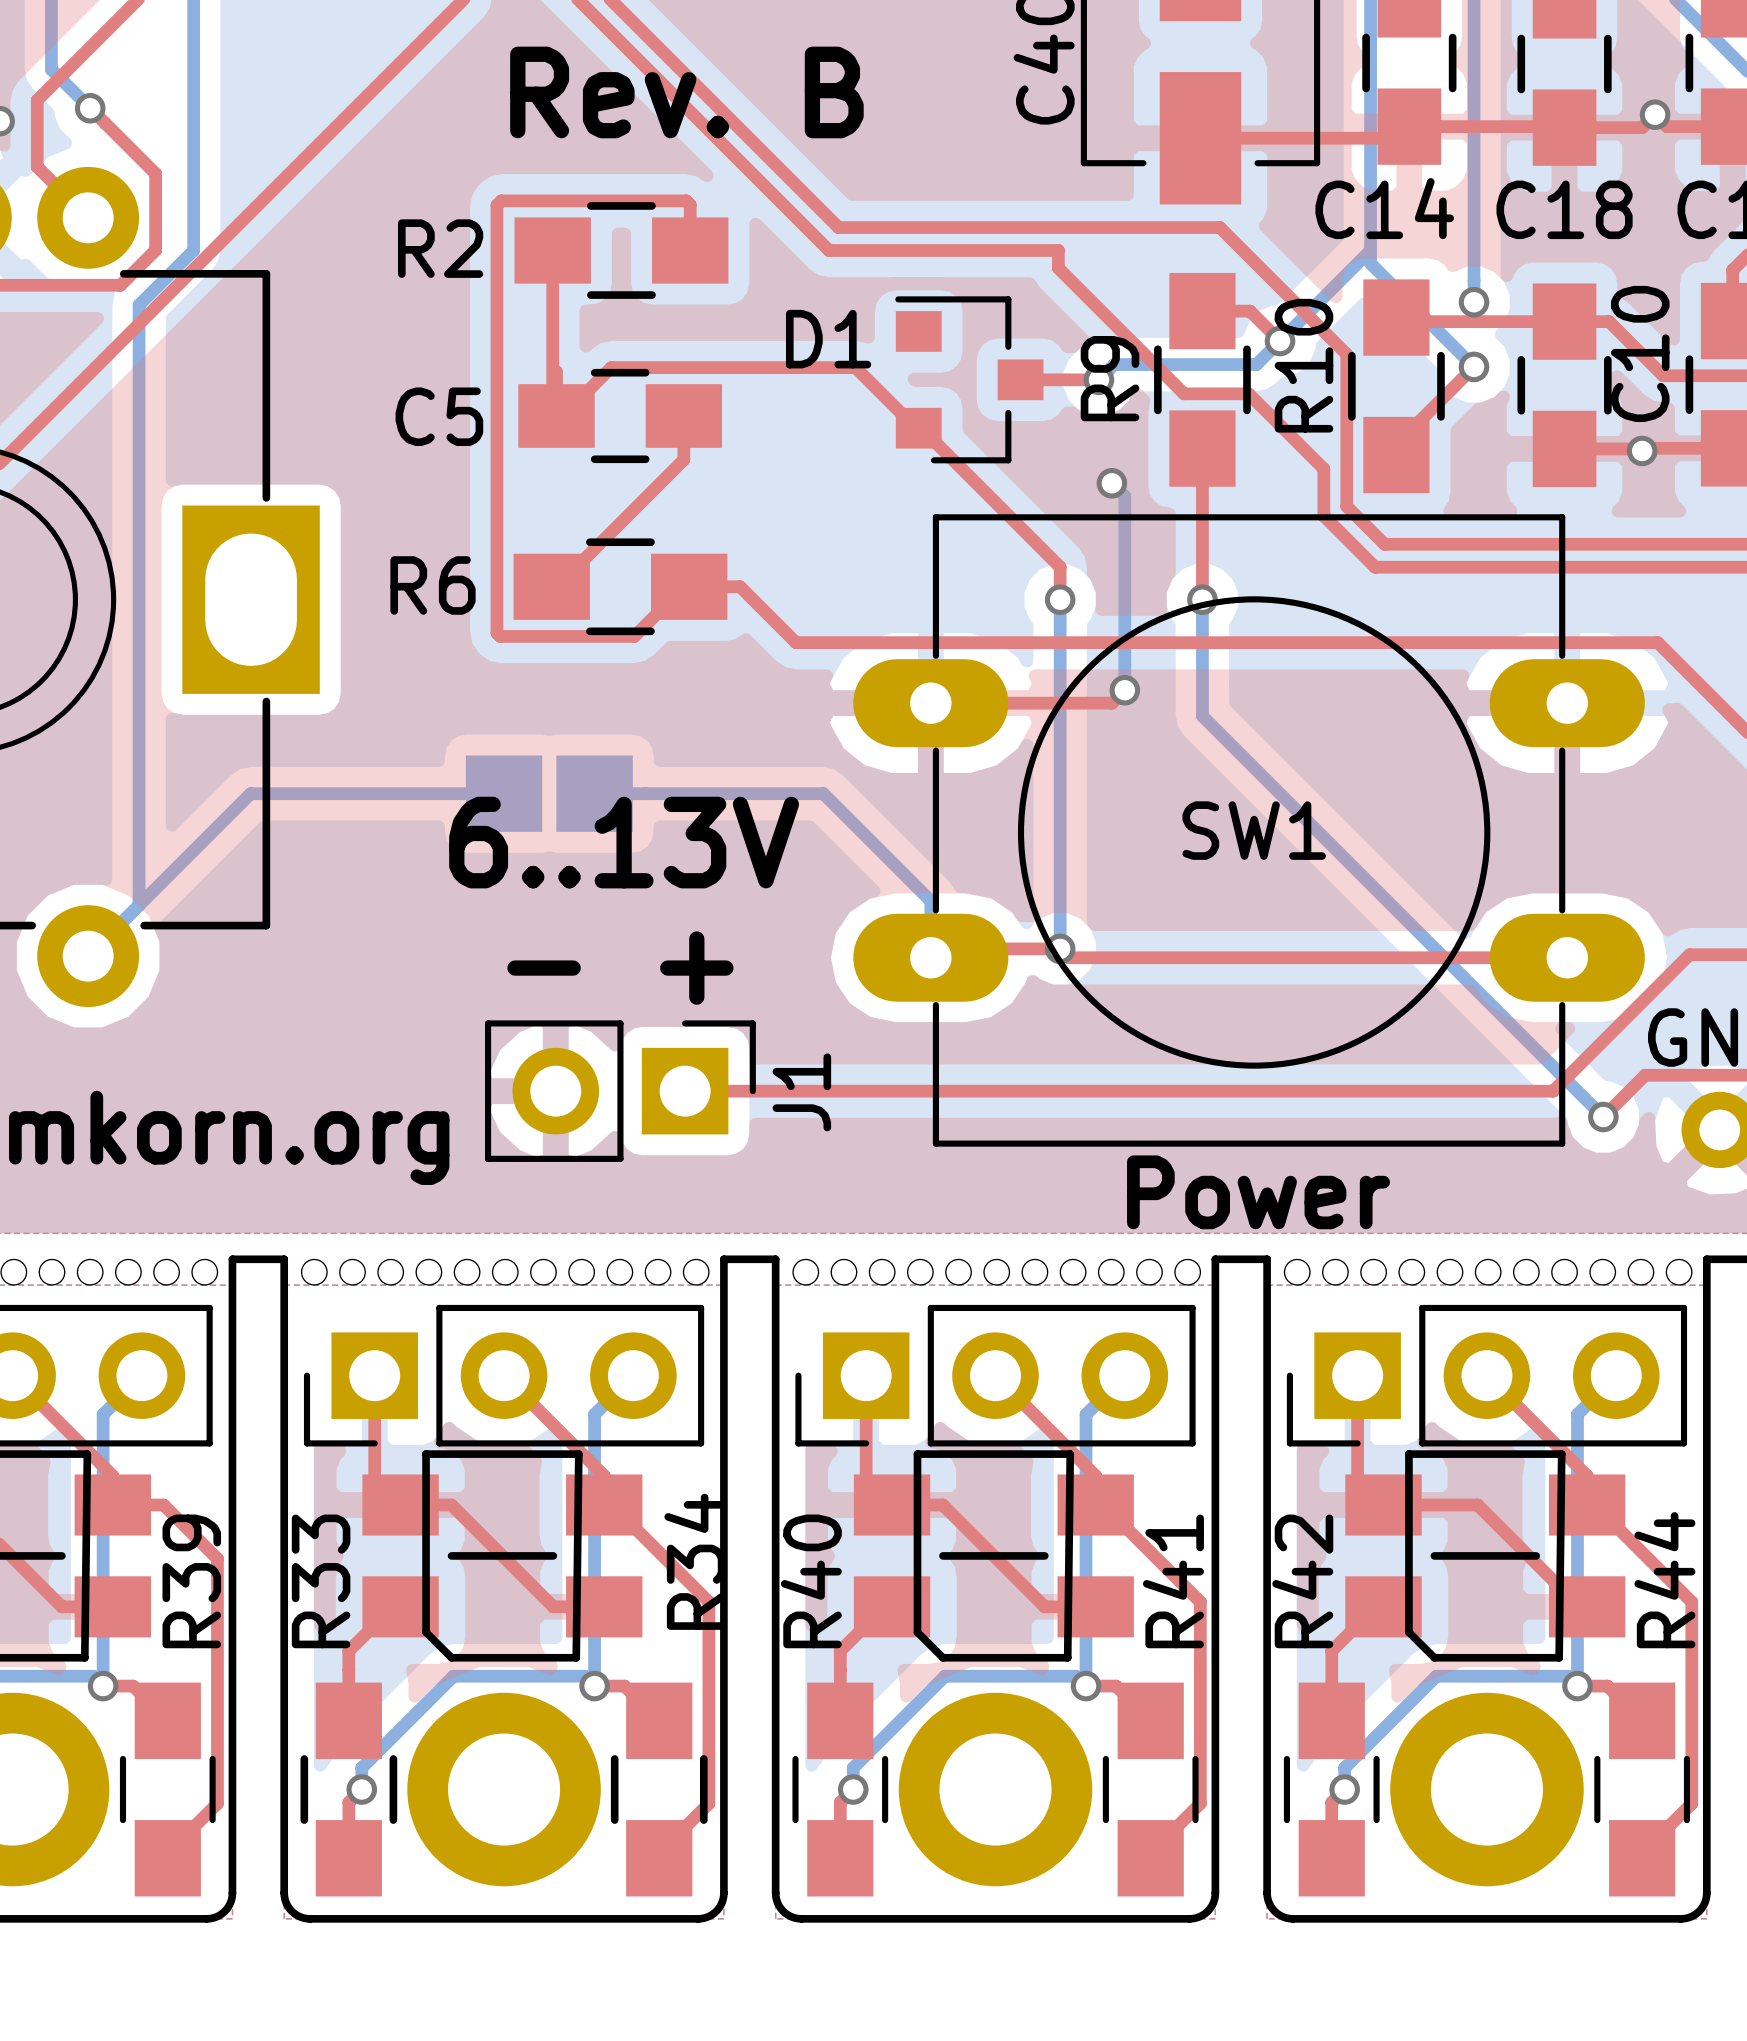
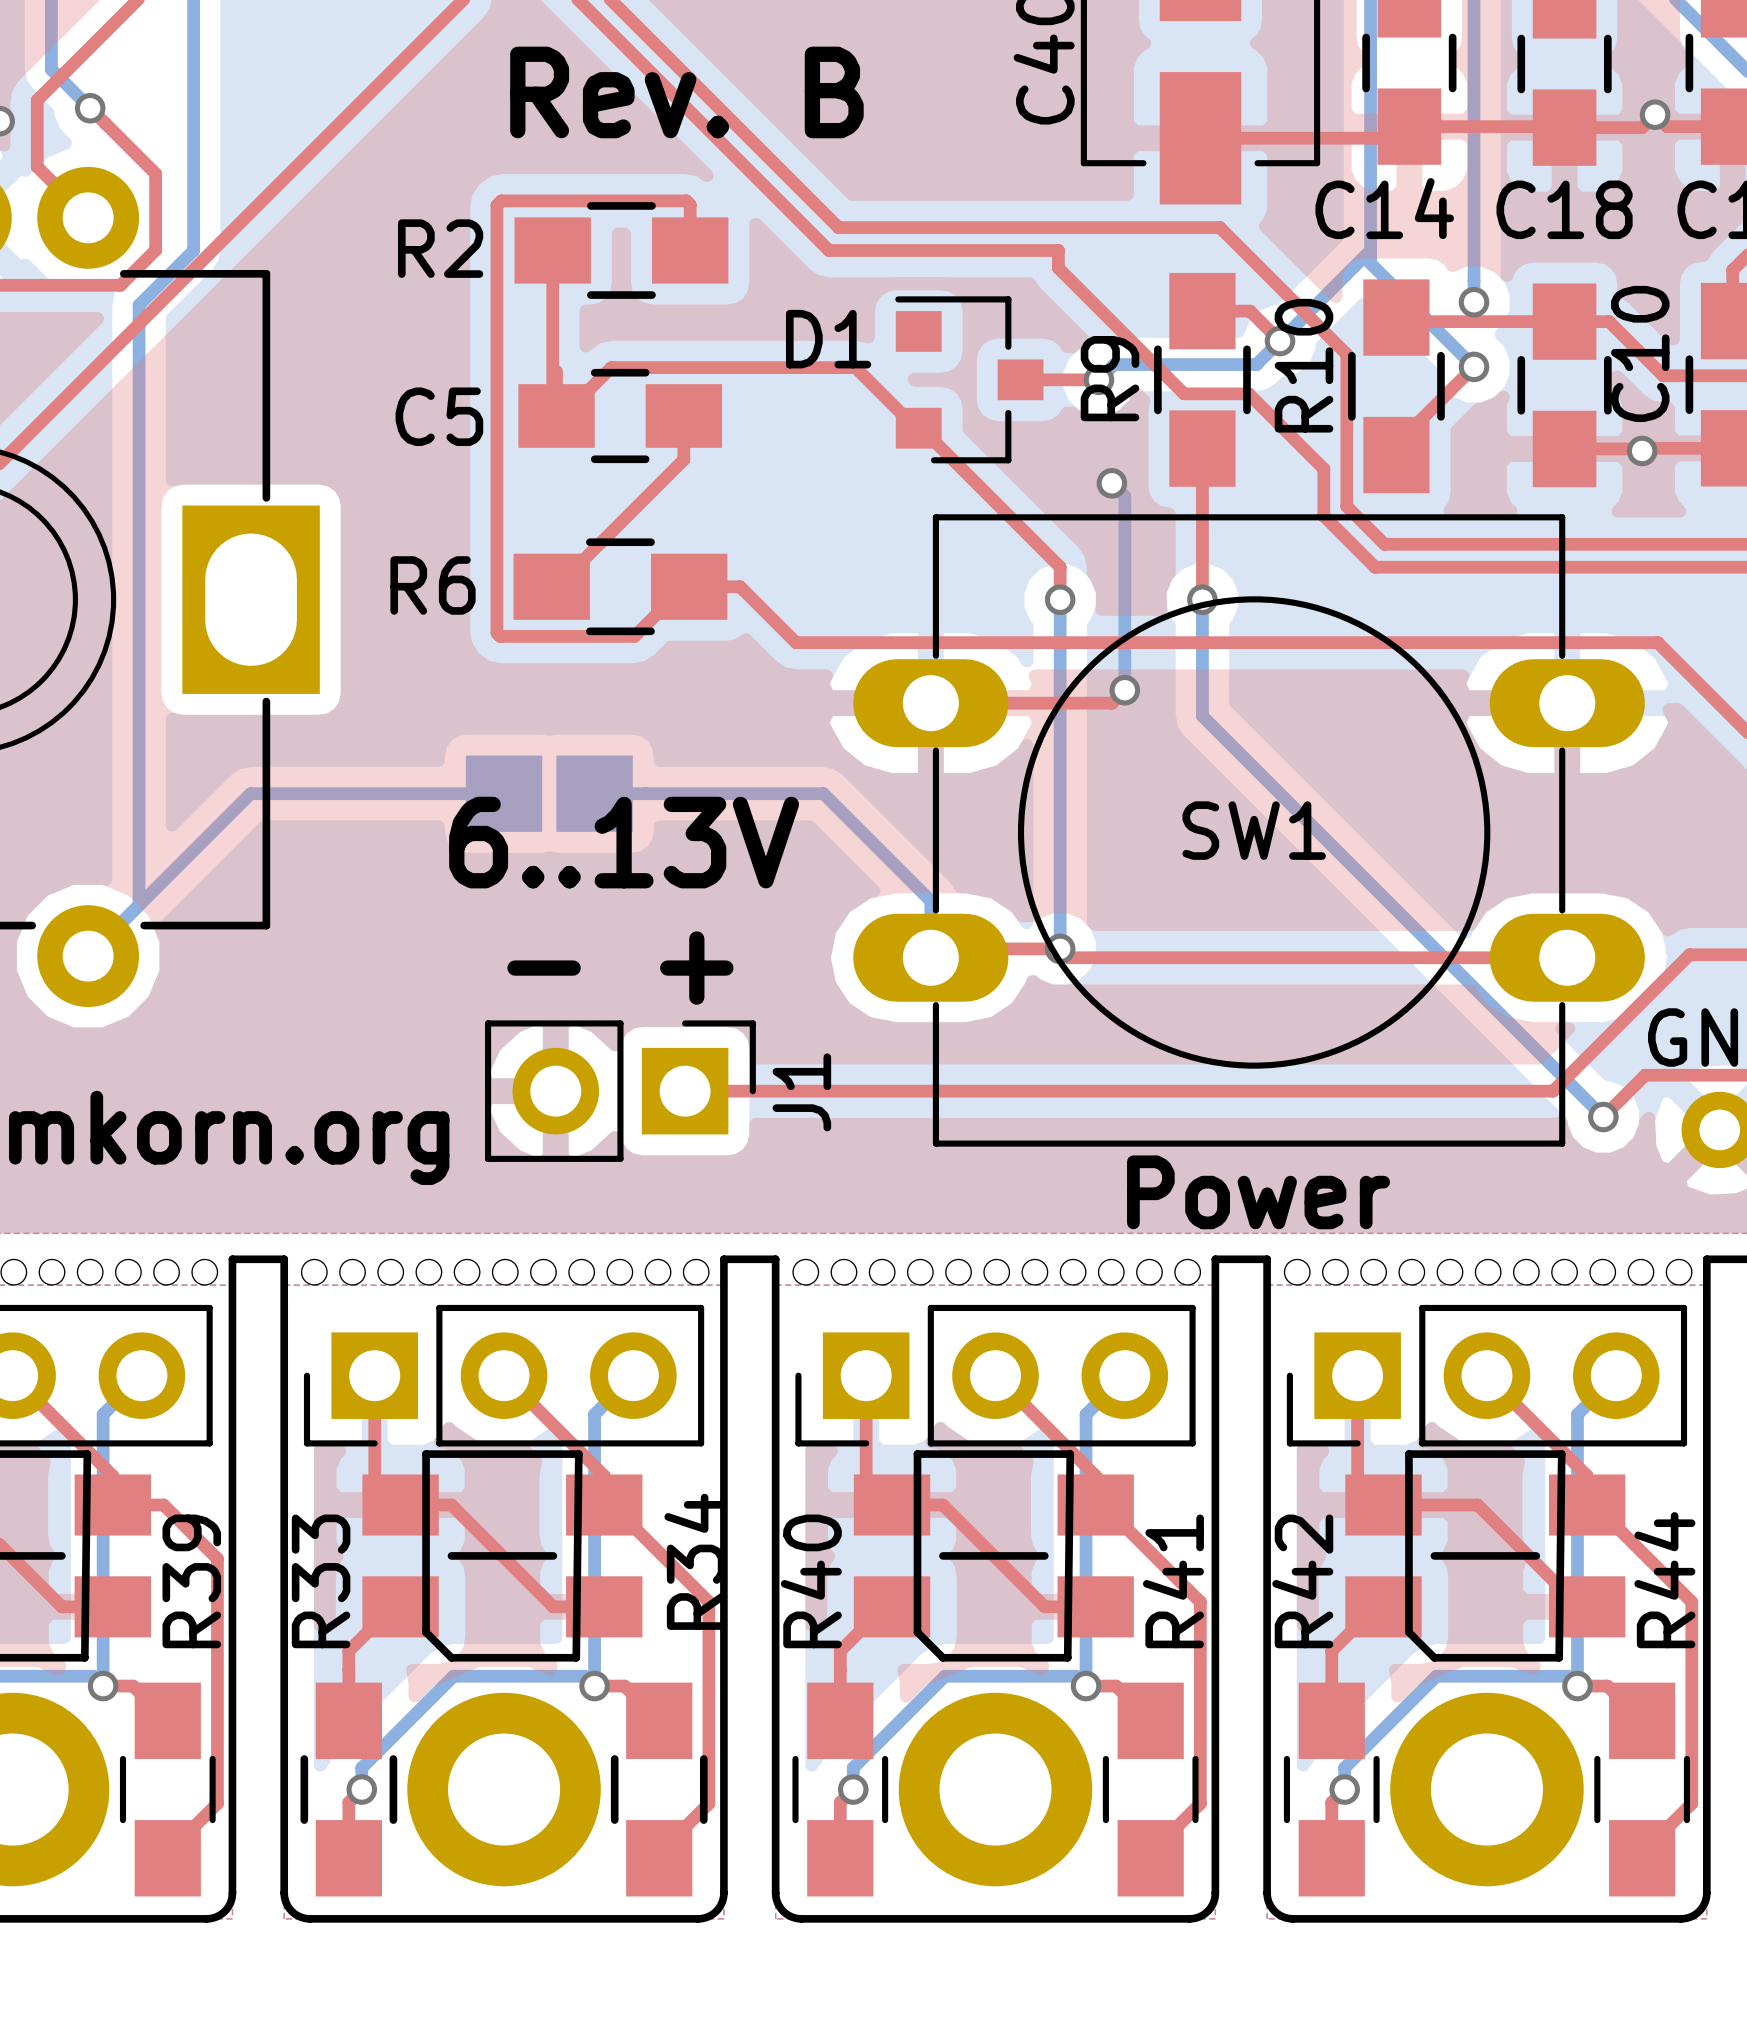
SW1 footprint: [853, 514, 1645, 1147] -> [853, 514, 1645, 1147]

